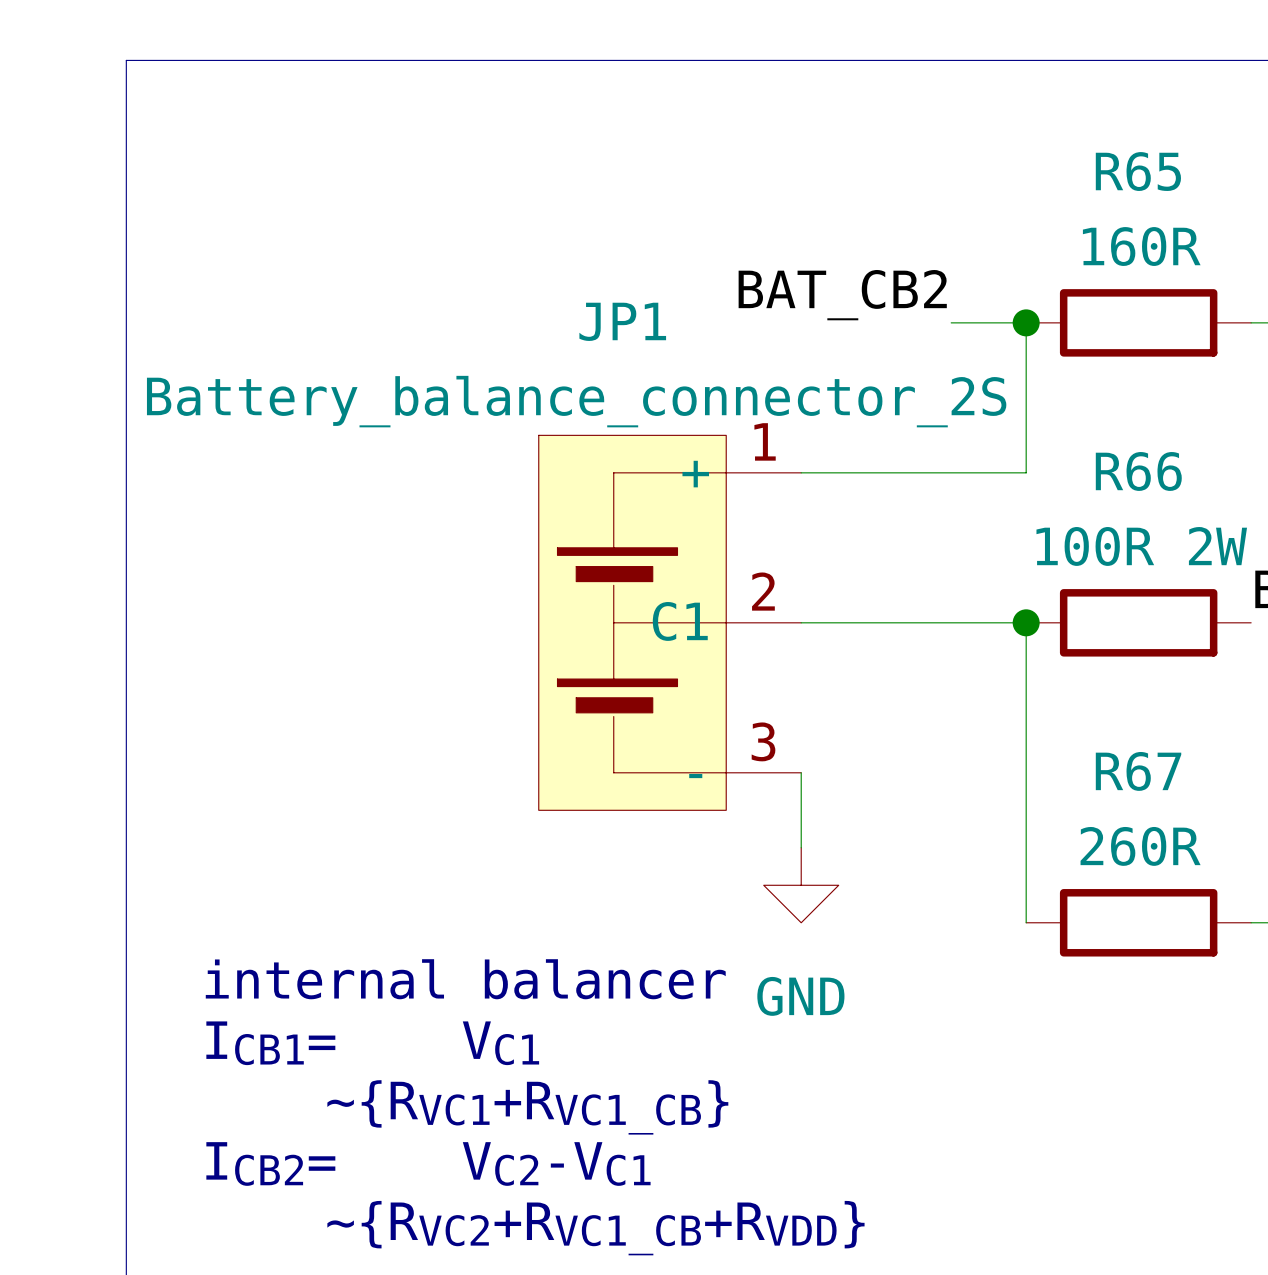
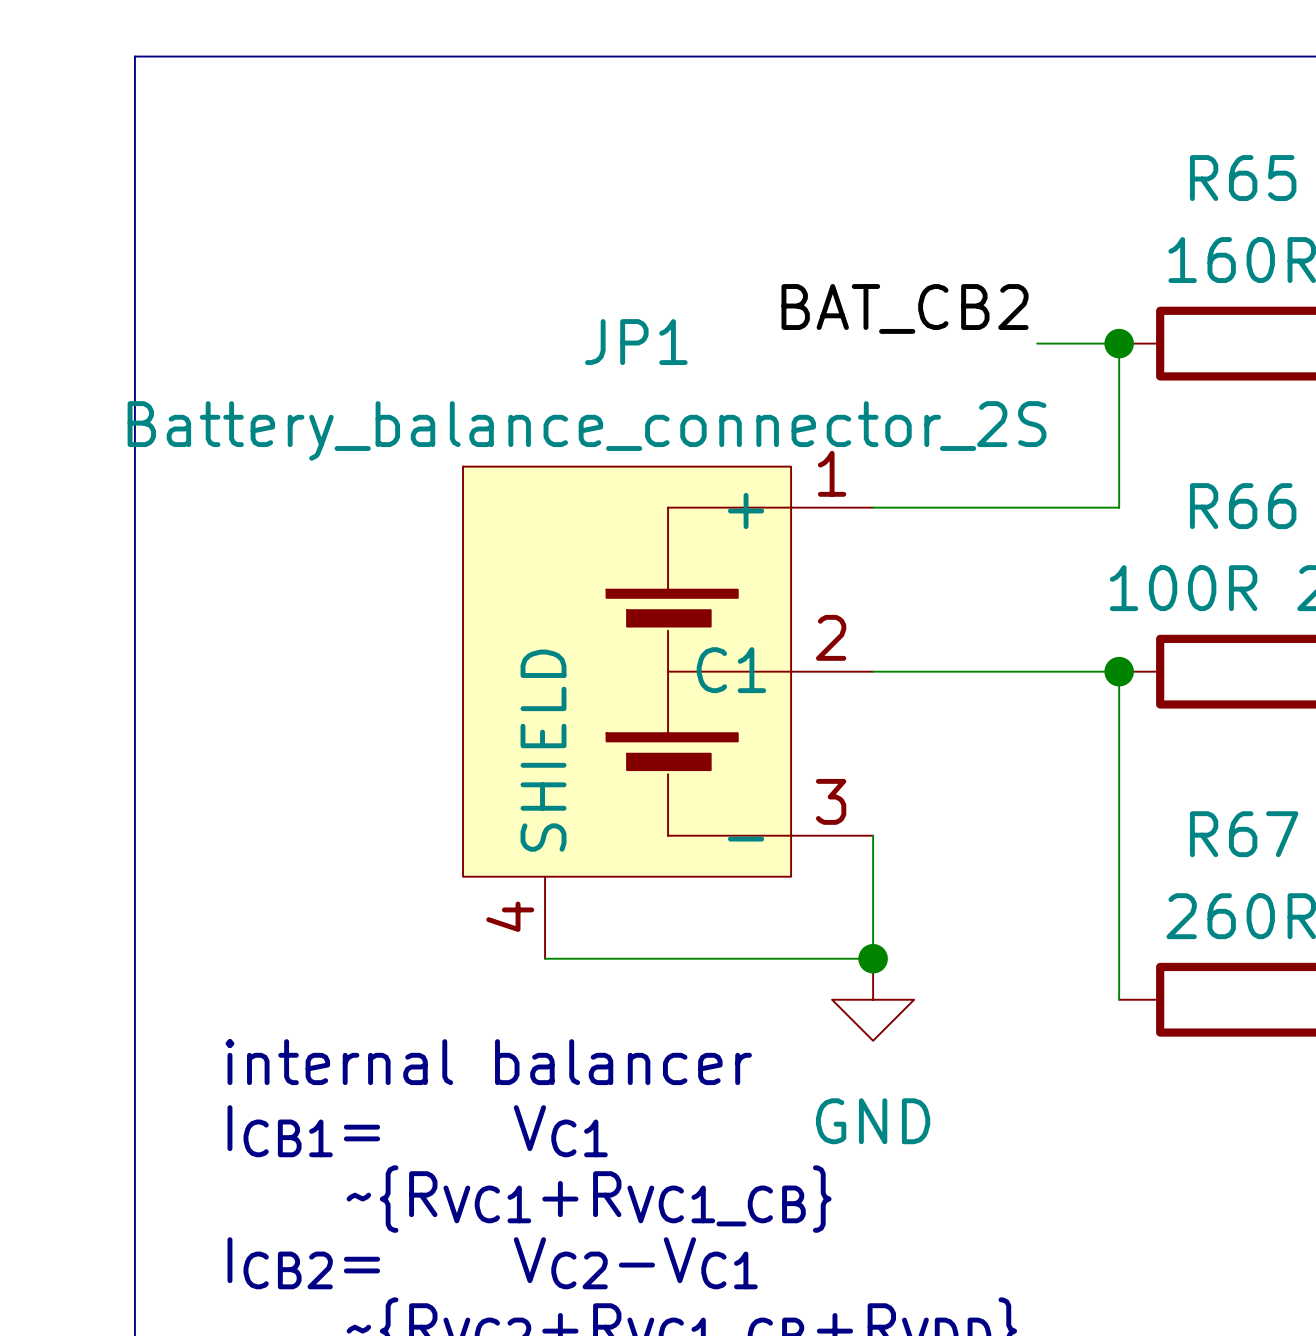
JP1 symbol: [538, 435, 802, 811] -> [463, 466, 874, 959]
wire: none -> (873, 917) (873, 958) (545, 958)
power symbol position: GND (801, 885) -> GND (873, 999)
junction: none -> (873, 958)

